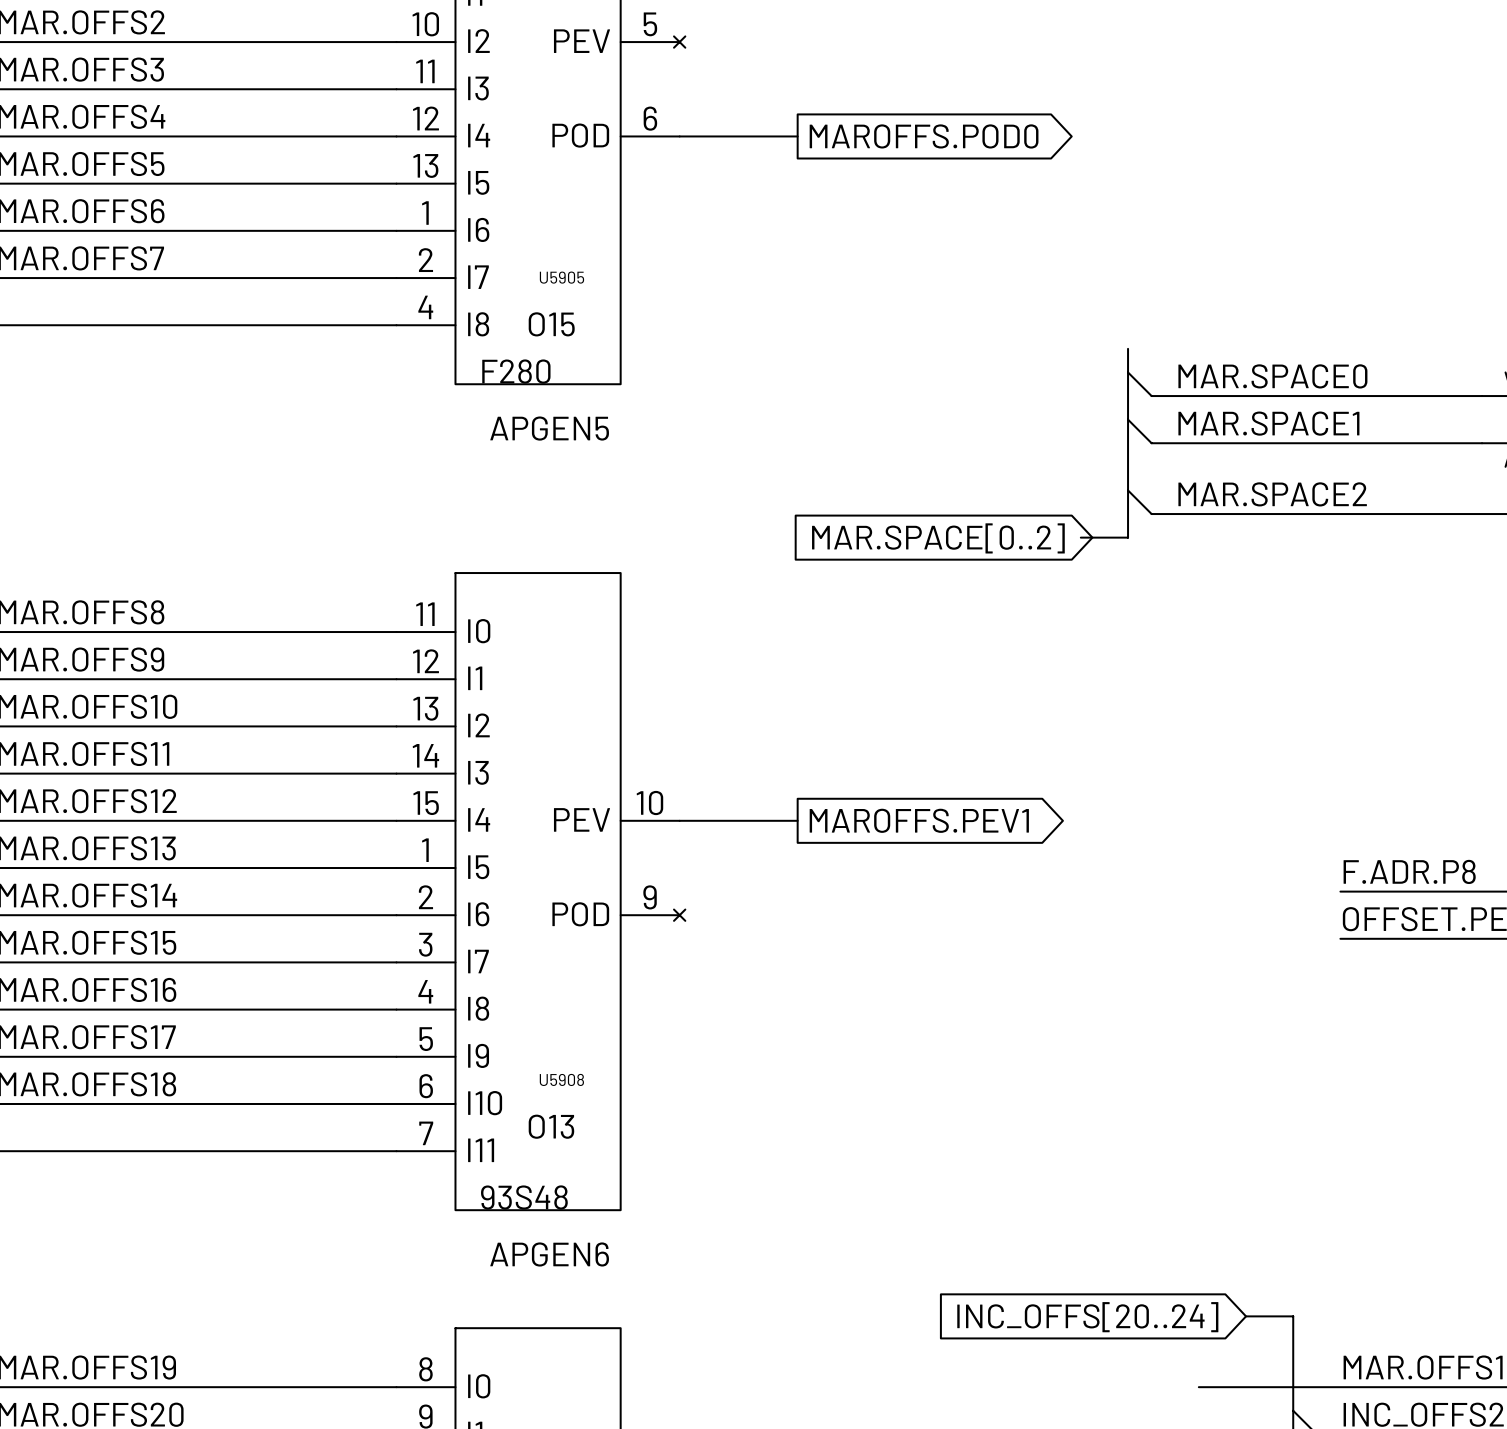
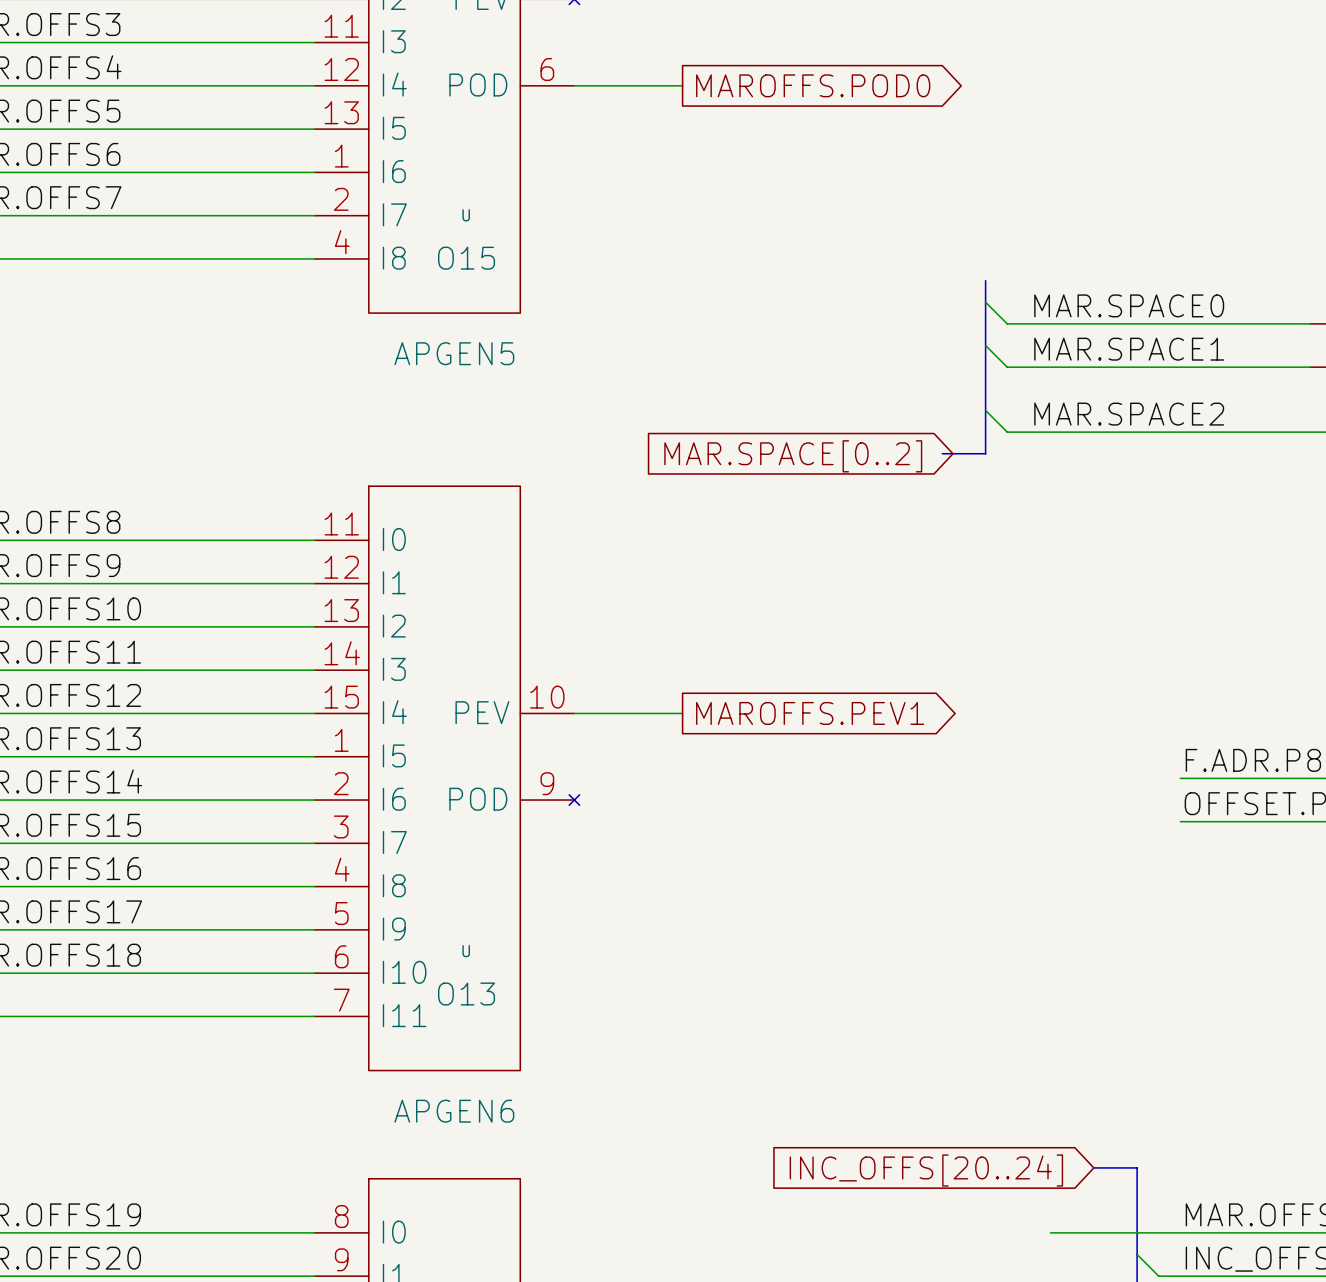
U5905 name: U5905 (561, 277) -> U (466, 215)
U5905 value: F280 (516, 371) -> none
U5908 name: U5908 (561, 1079) -> U (466, 951)
U5908 value: 93S48 (524, 1197) -> none

